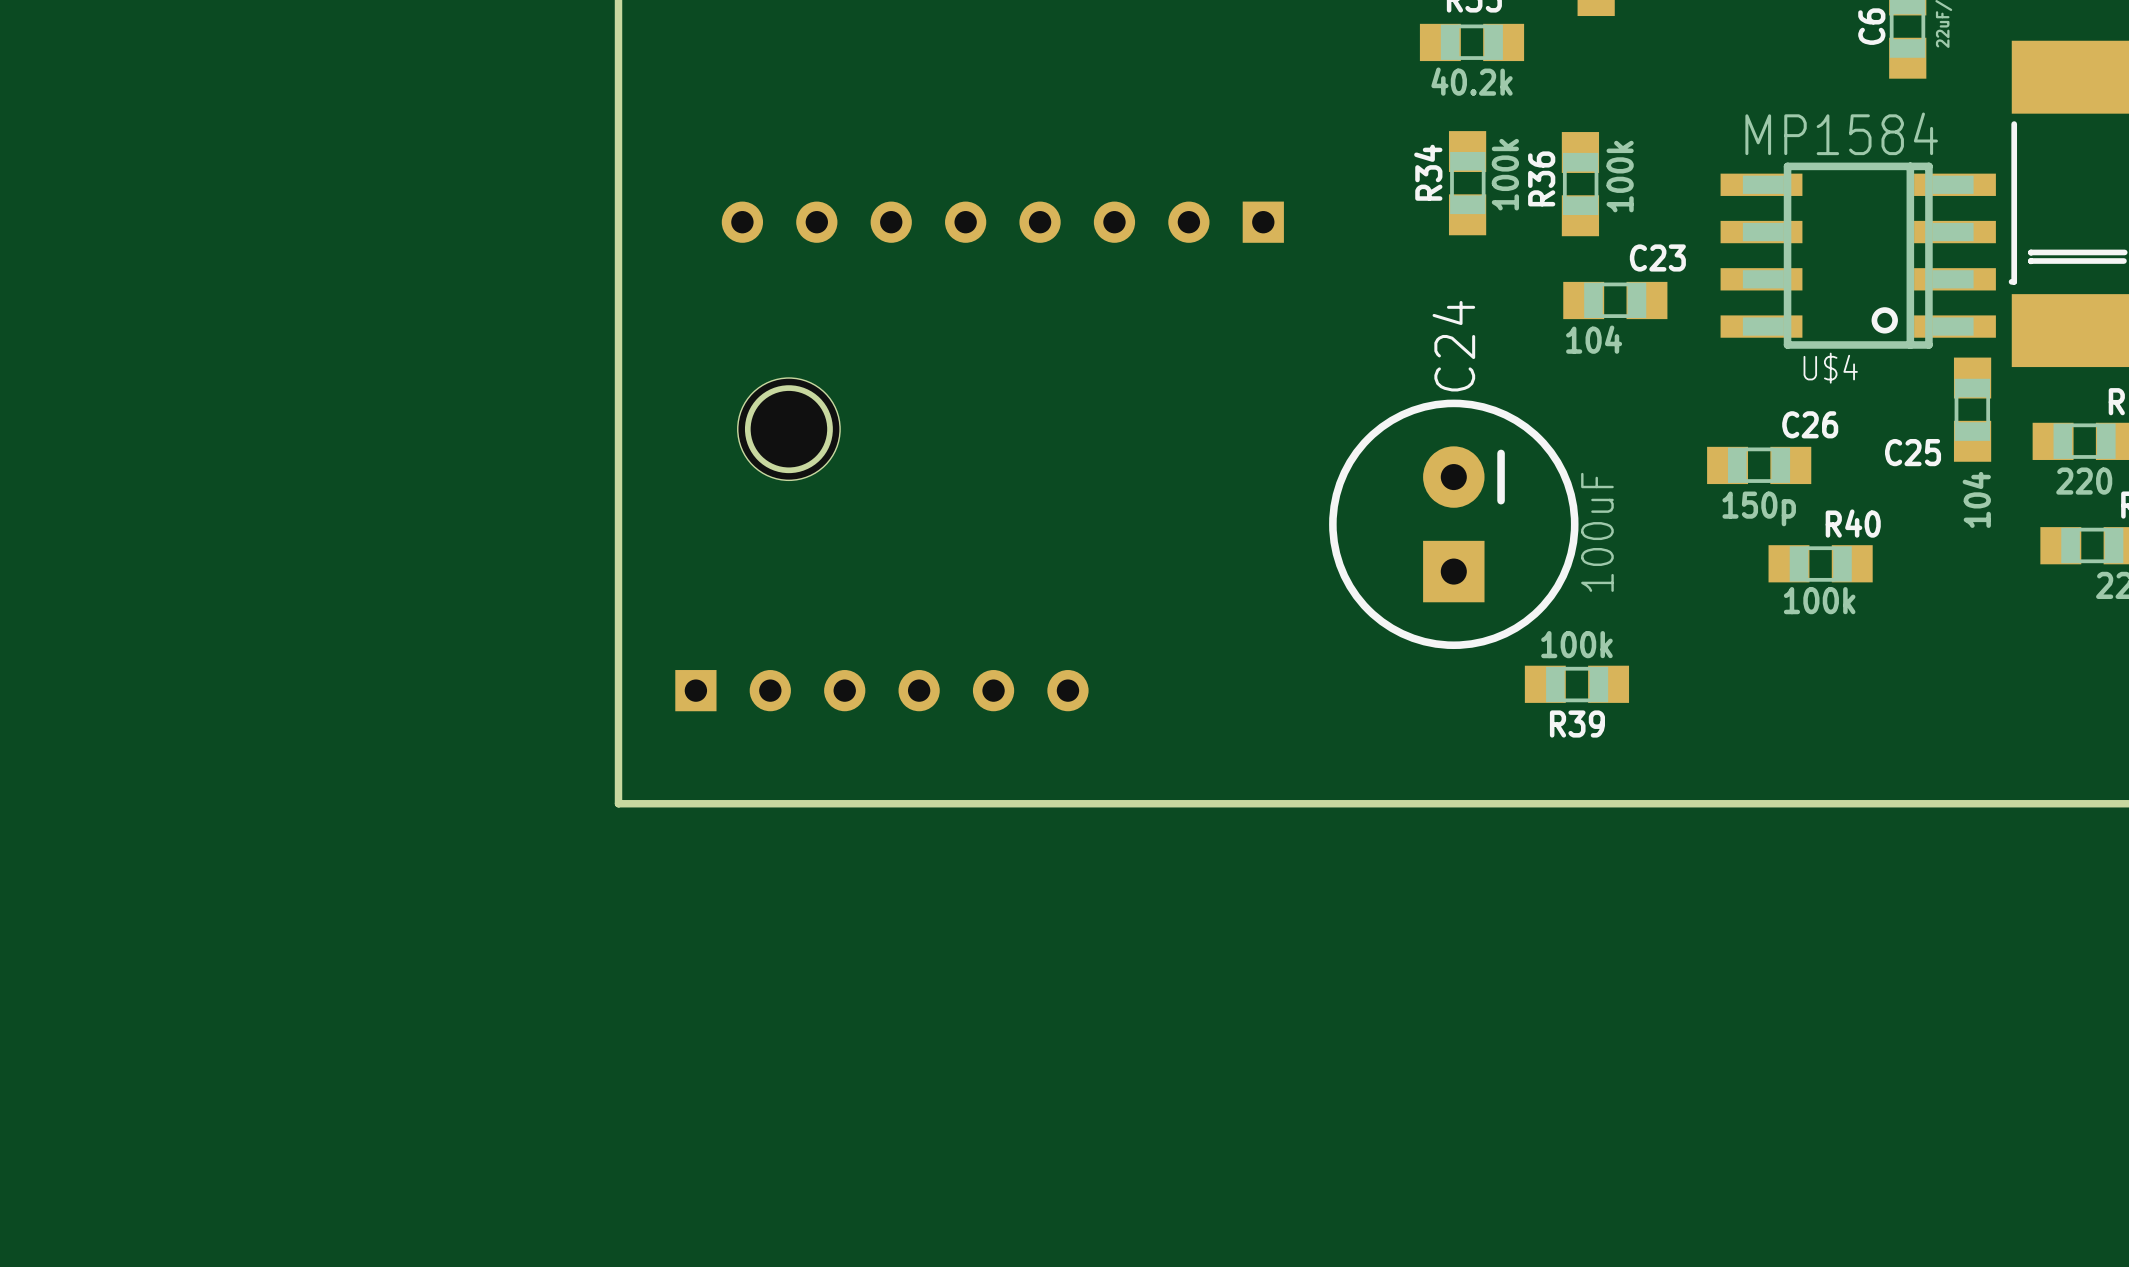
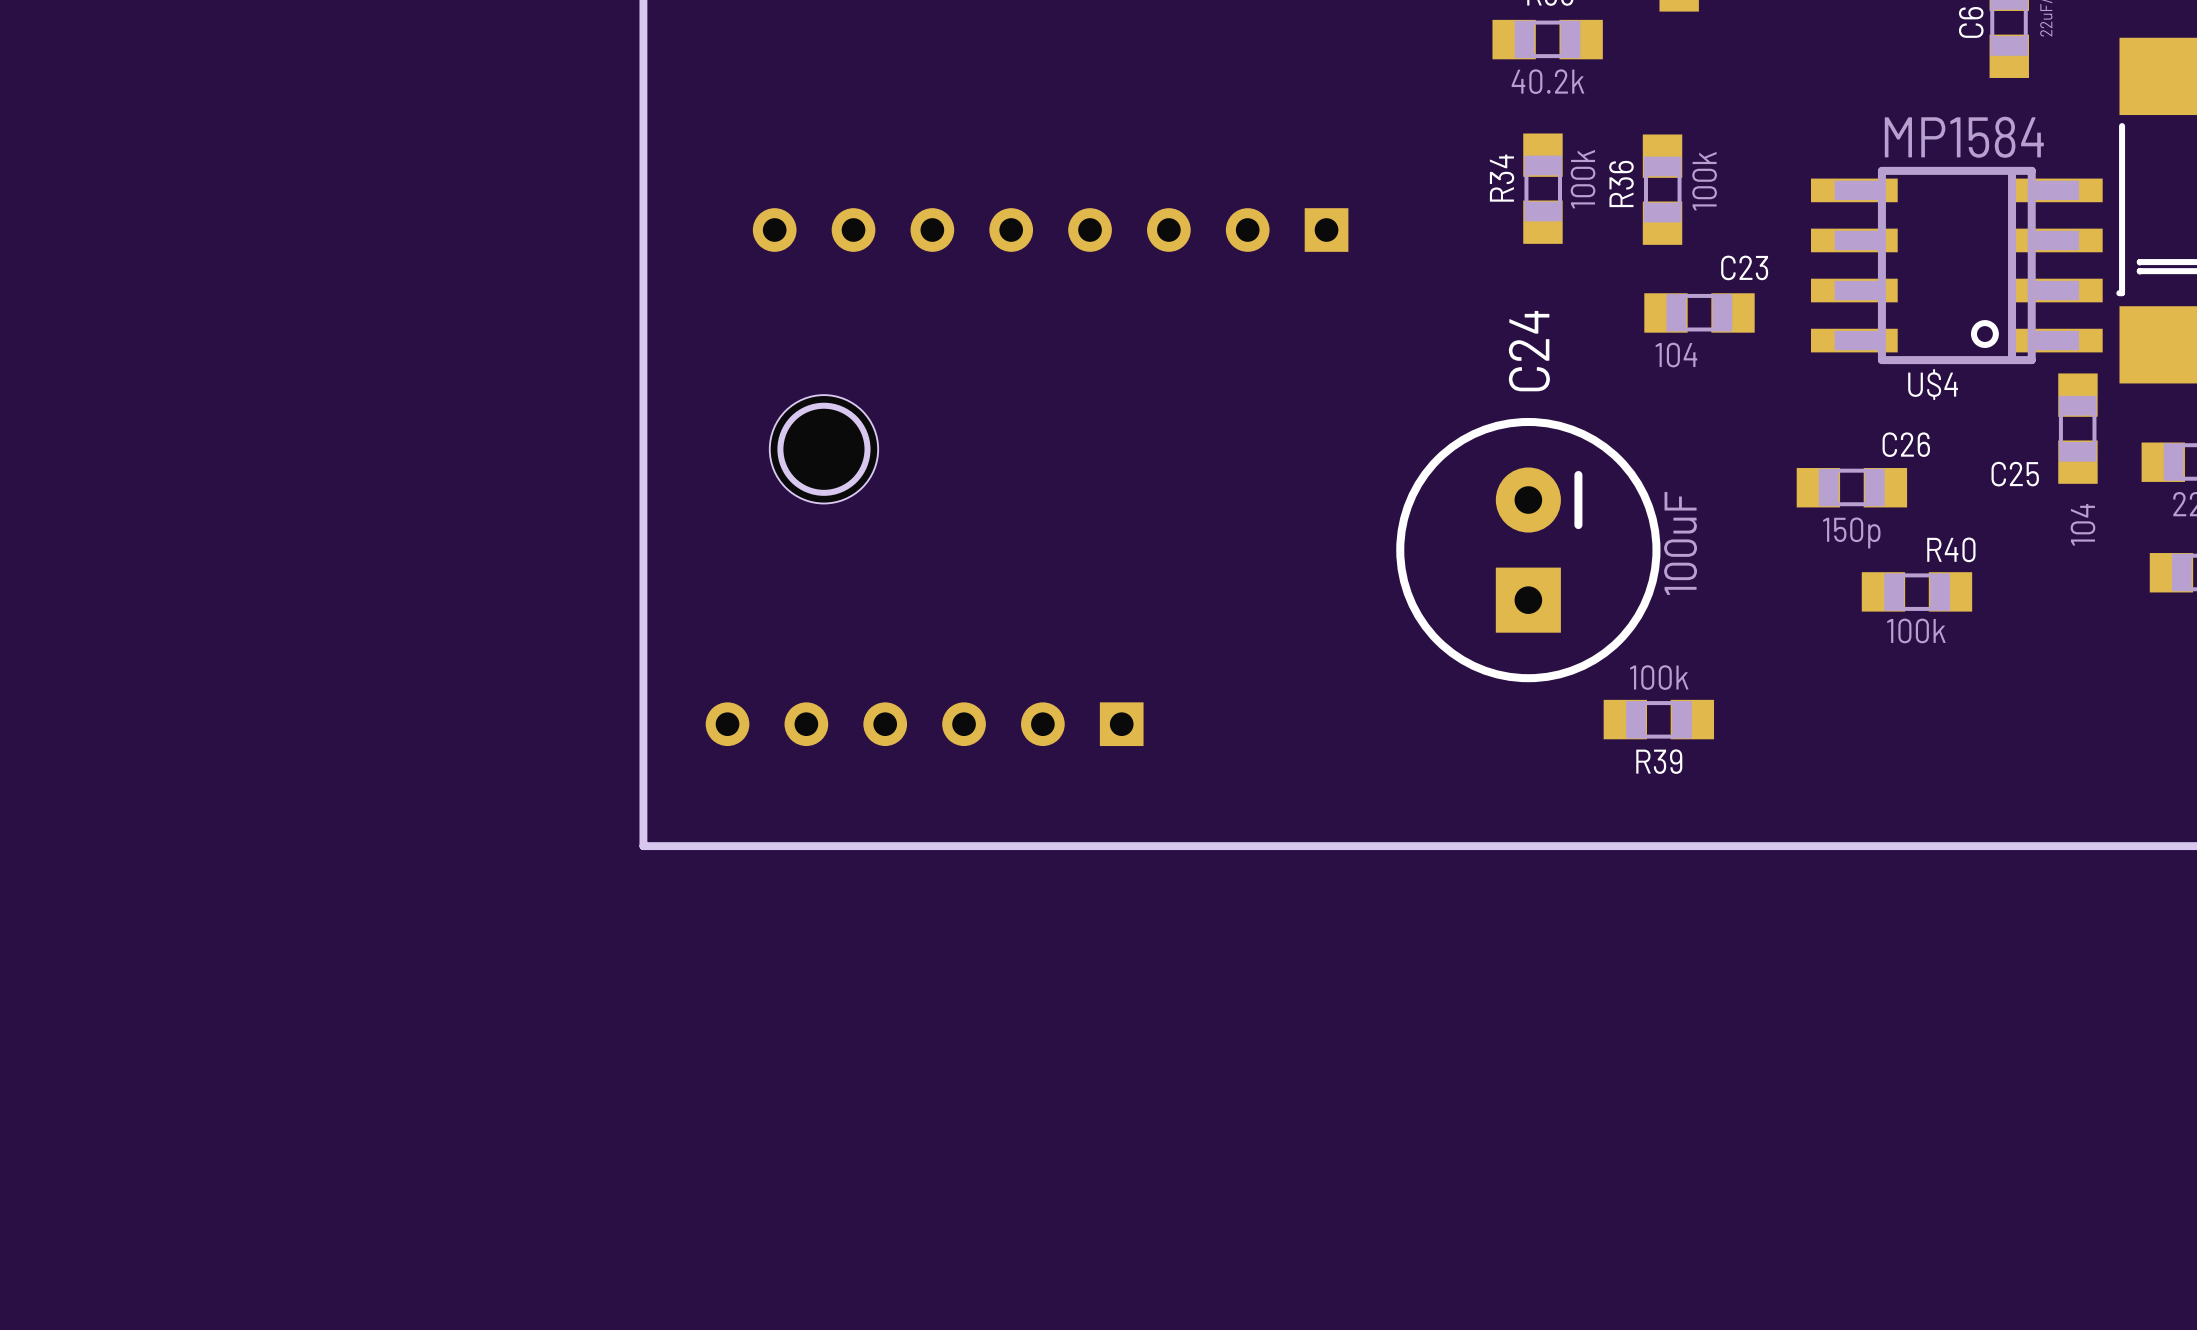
part rotation: 0° (881, 690) -> 180° (924, 724)

